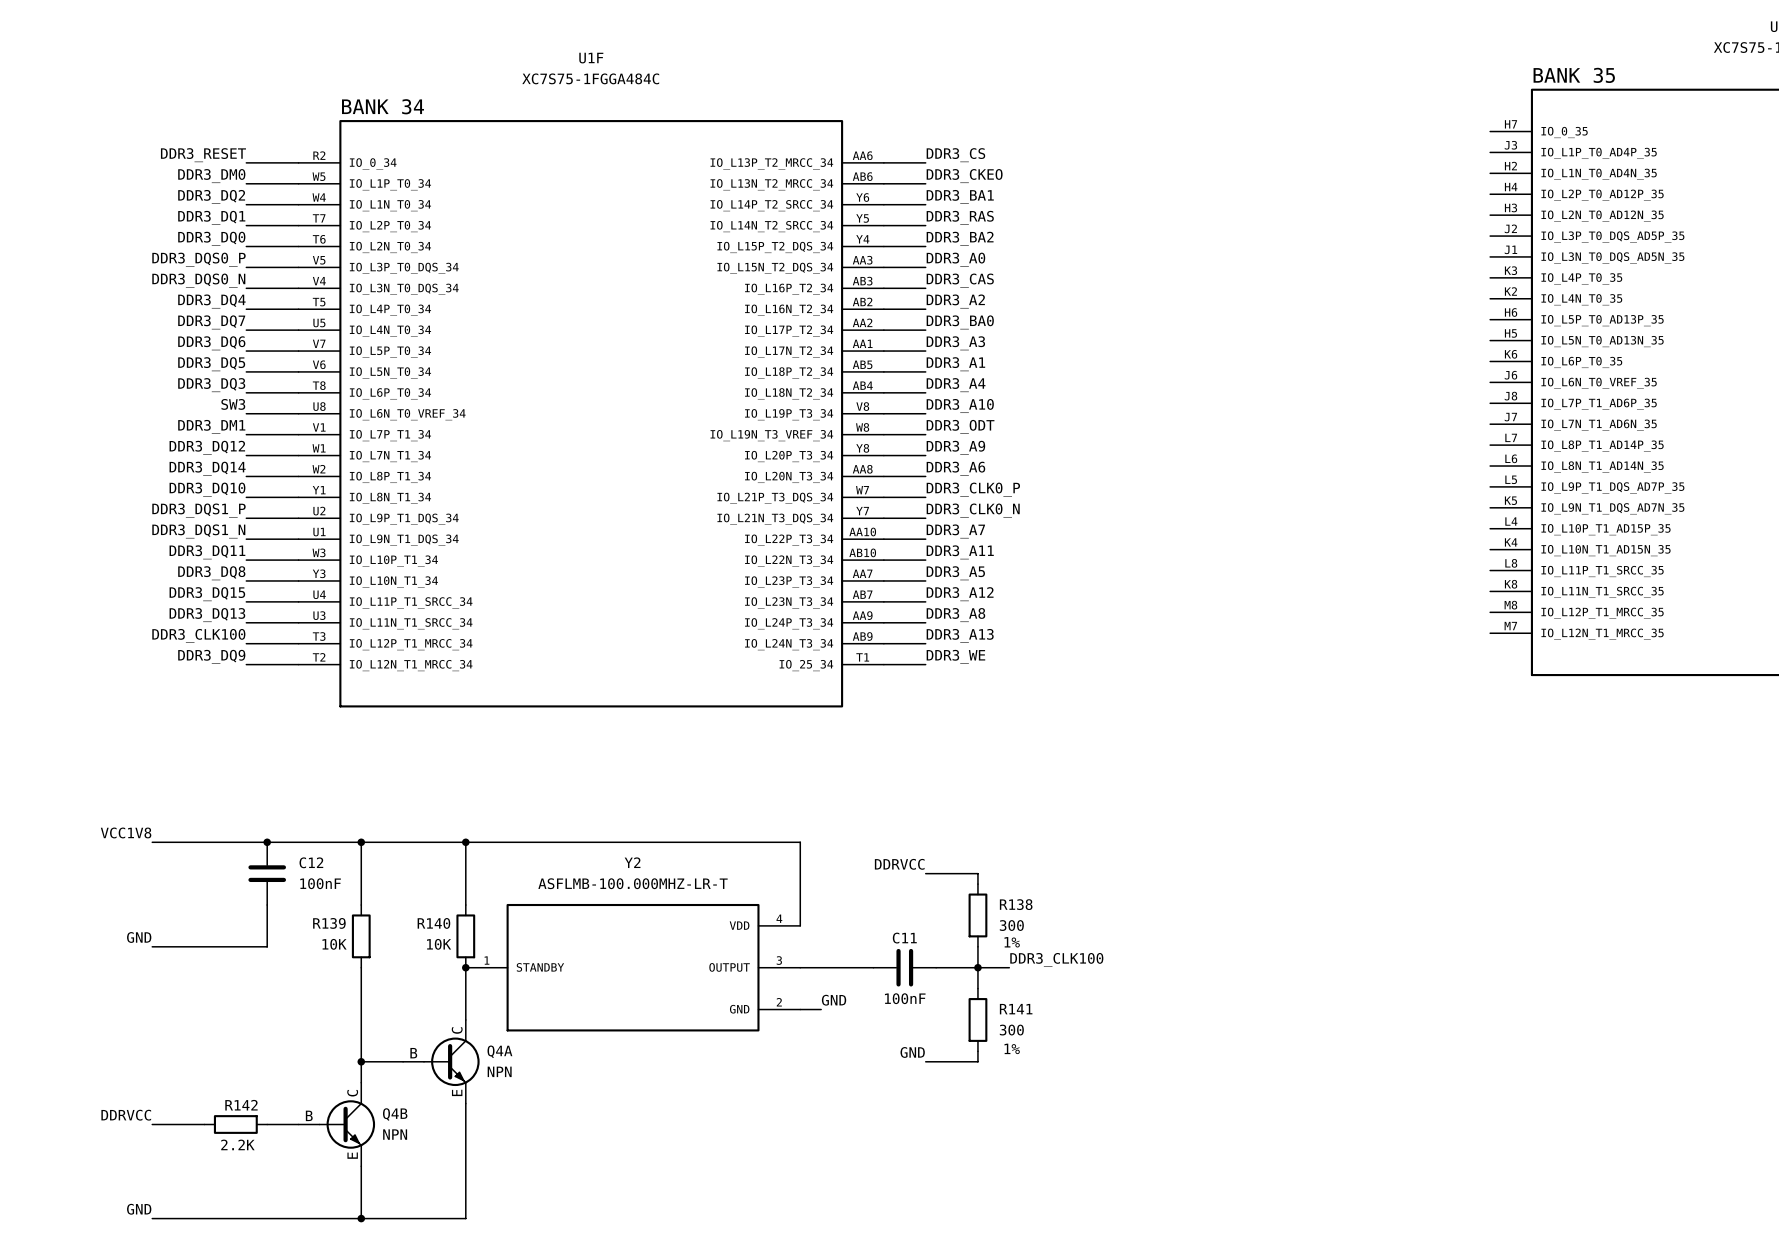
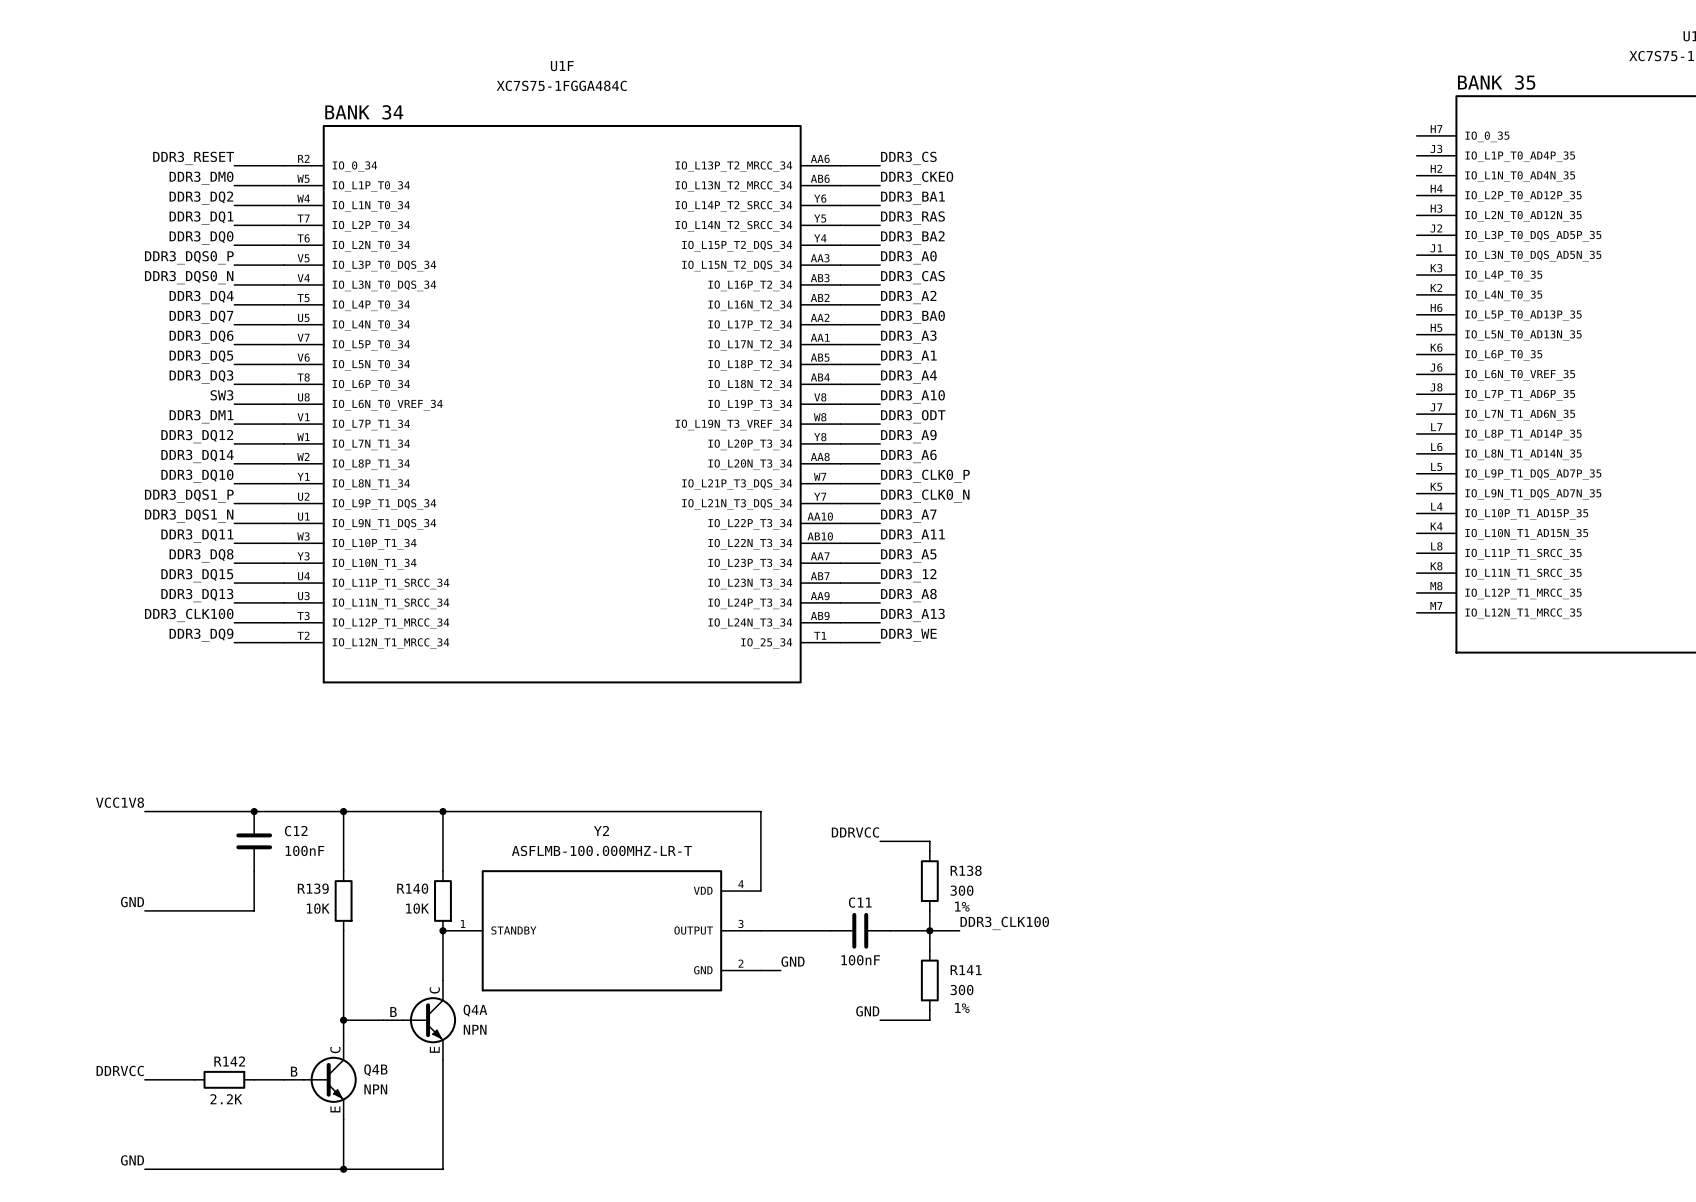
label: DDR3_A12 (960, 594) -> DDR3_12 (908, 575)

